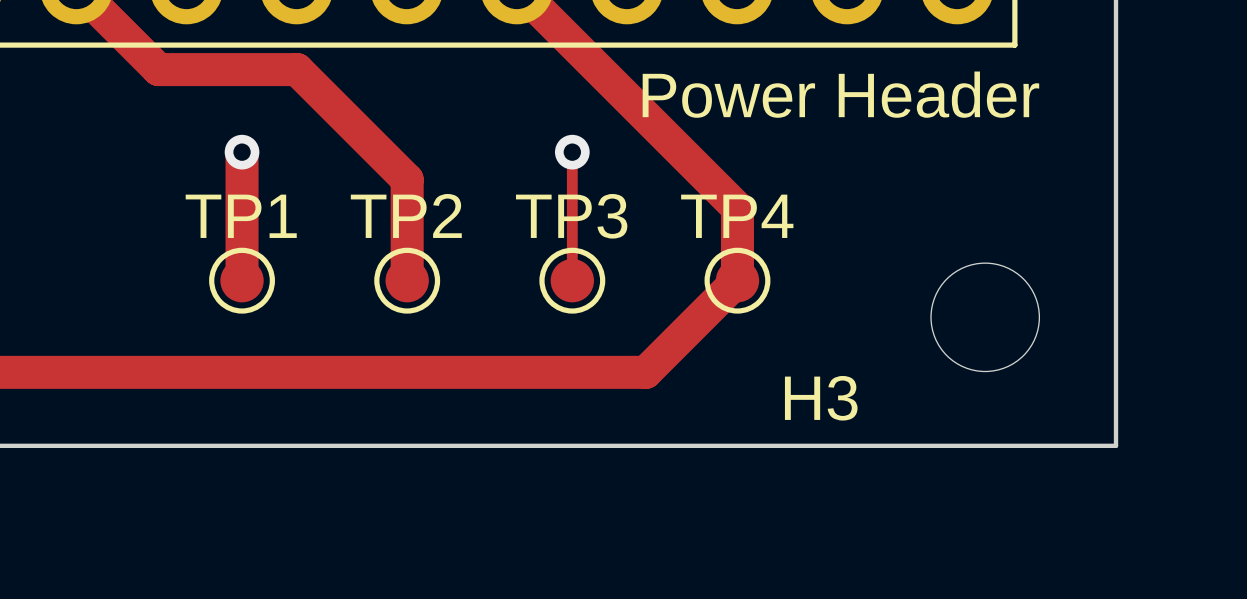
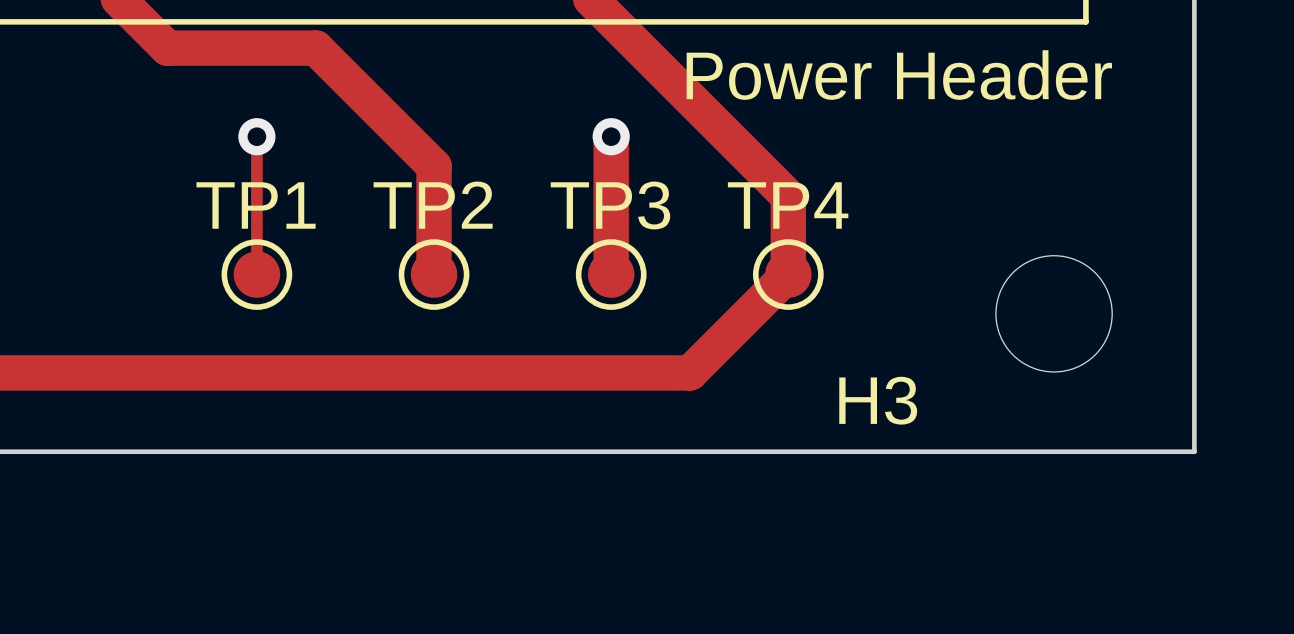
top track width: thick (242, 152) (242, 280) -> thin (256, 136) (256, 274)
top track width: thin (572, 152) (572, 280) -> thick (611, 136) (611, 274)

